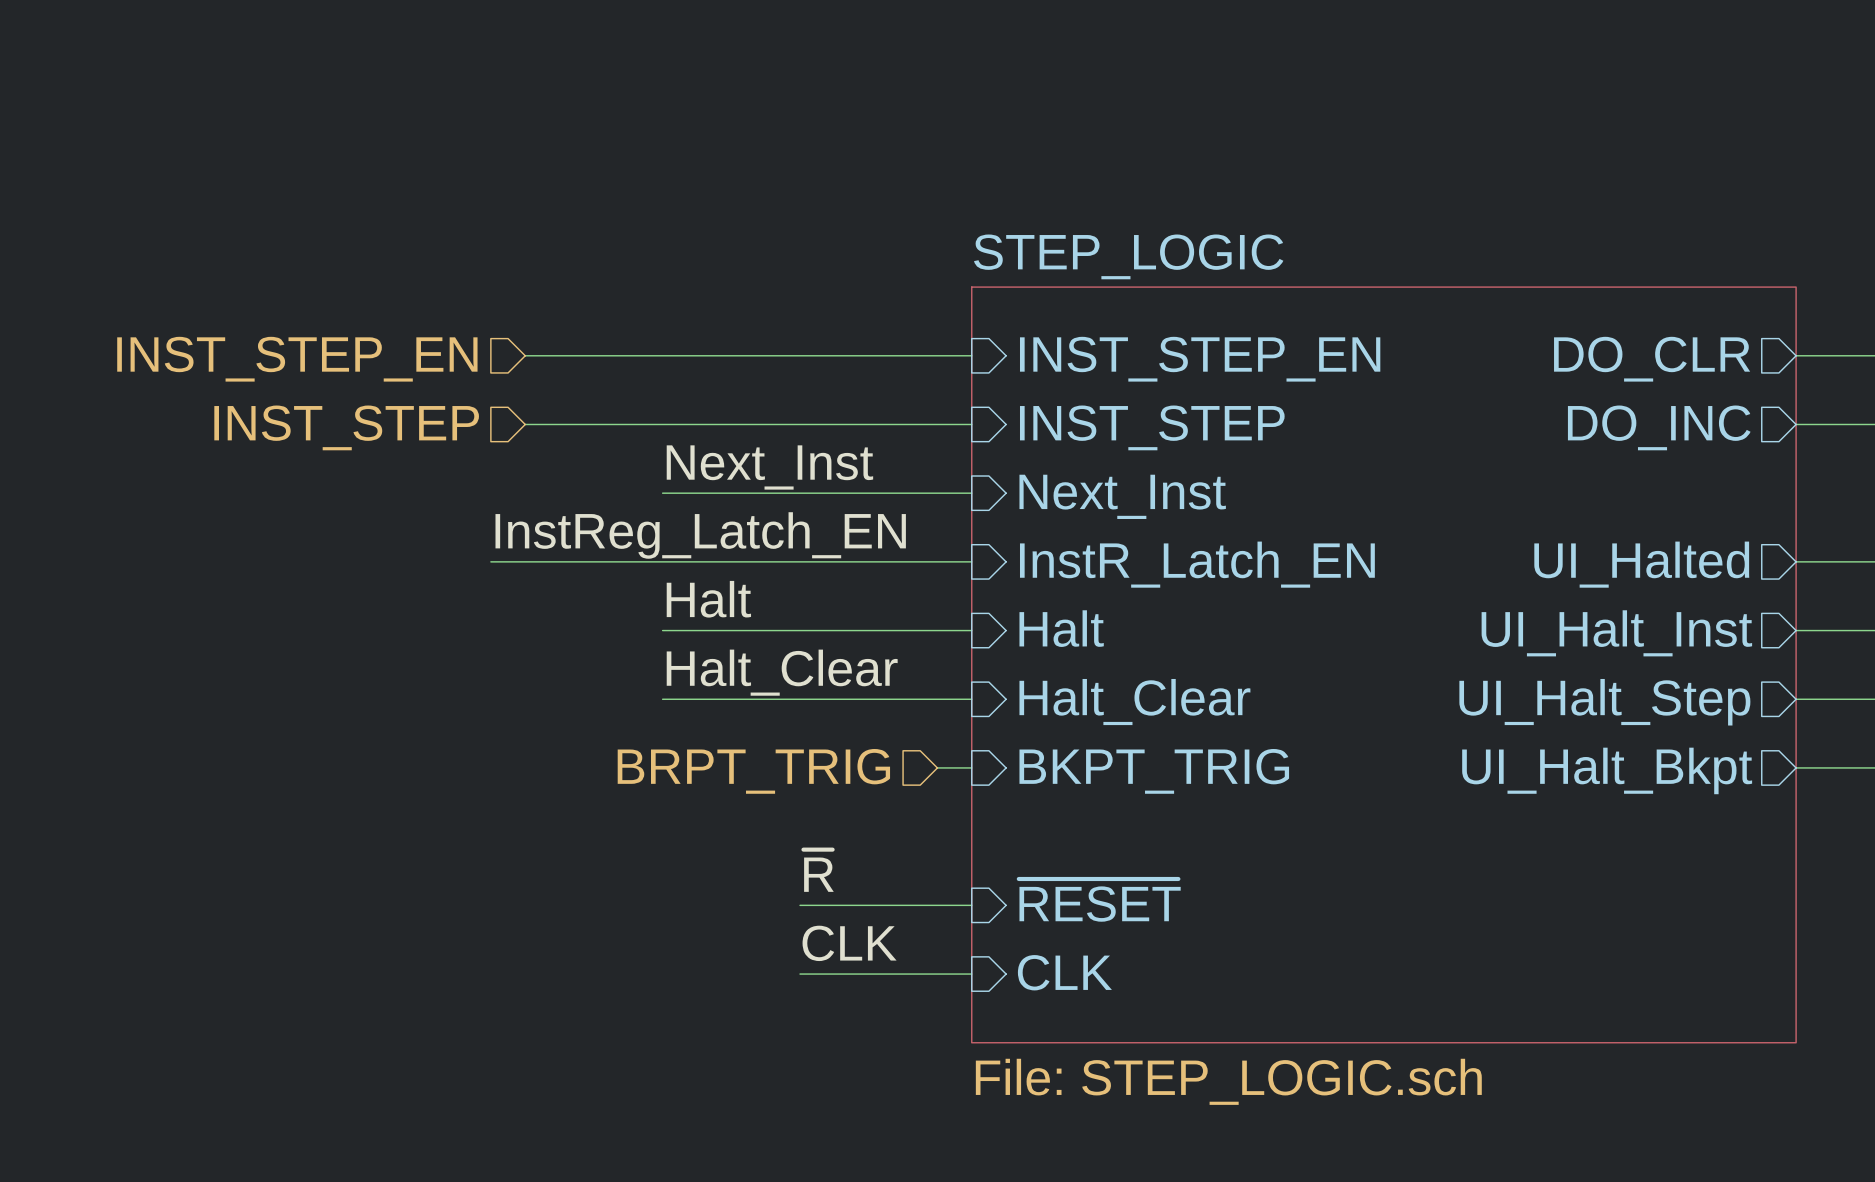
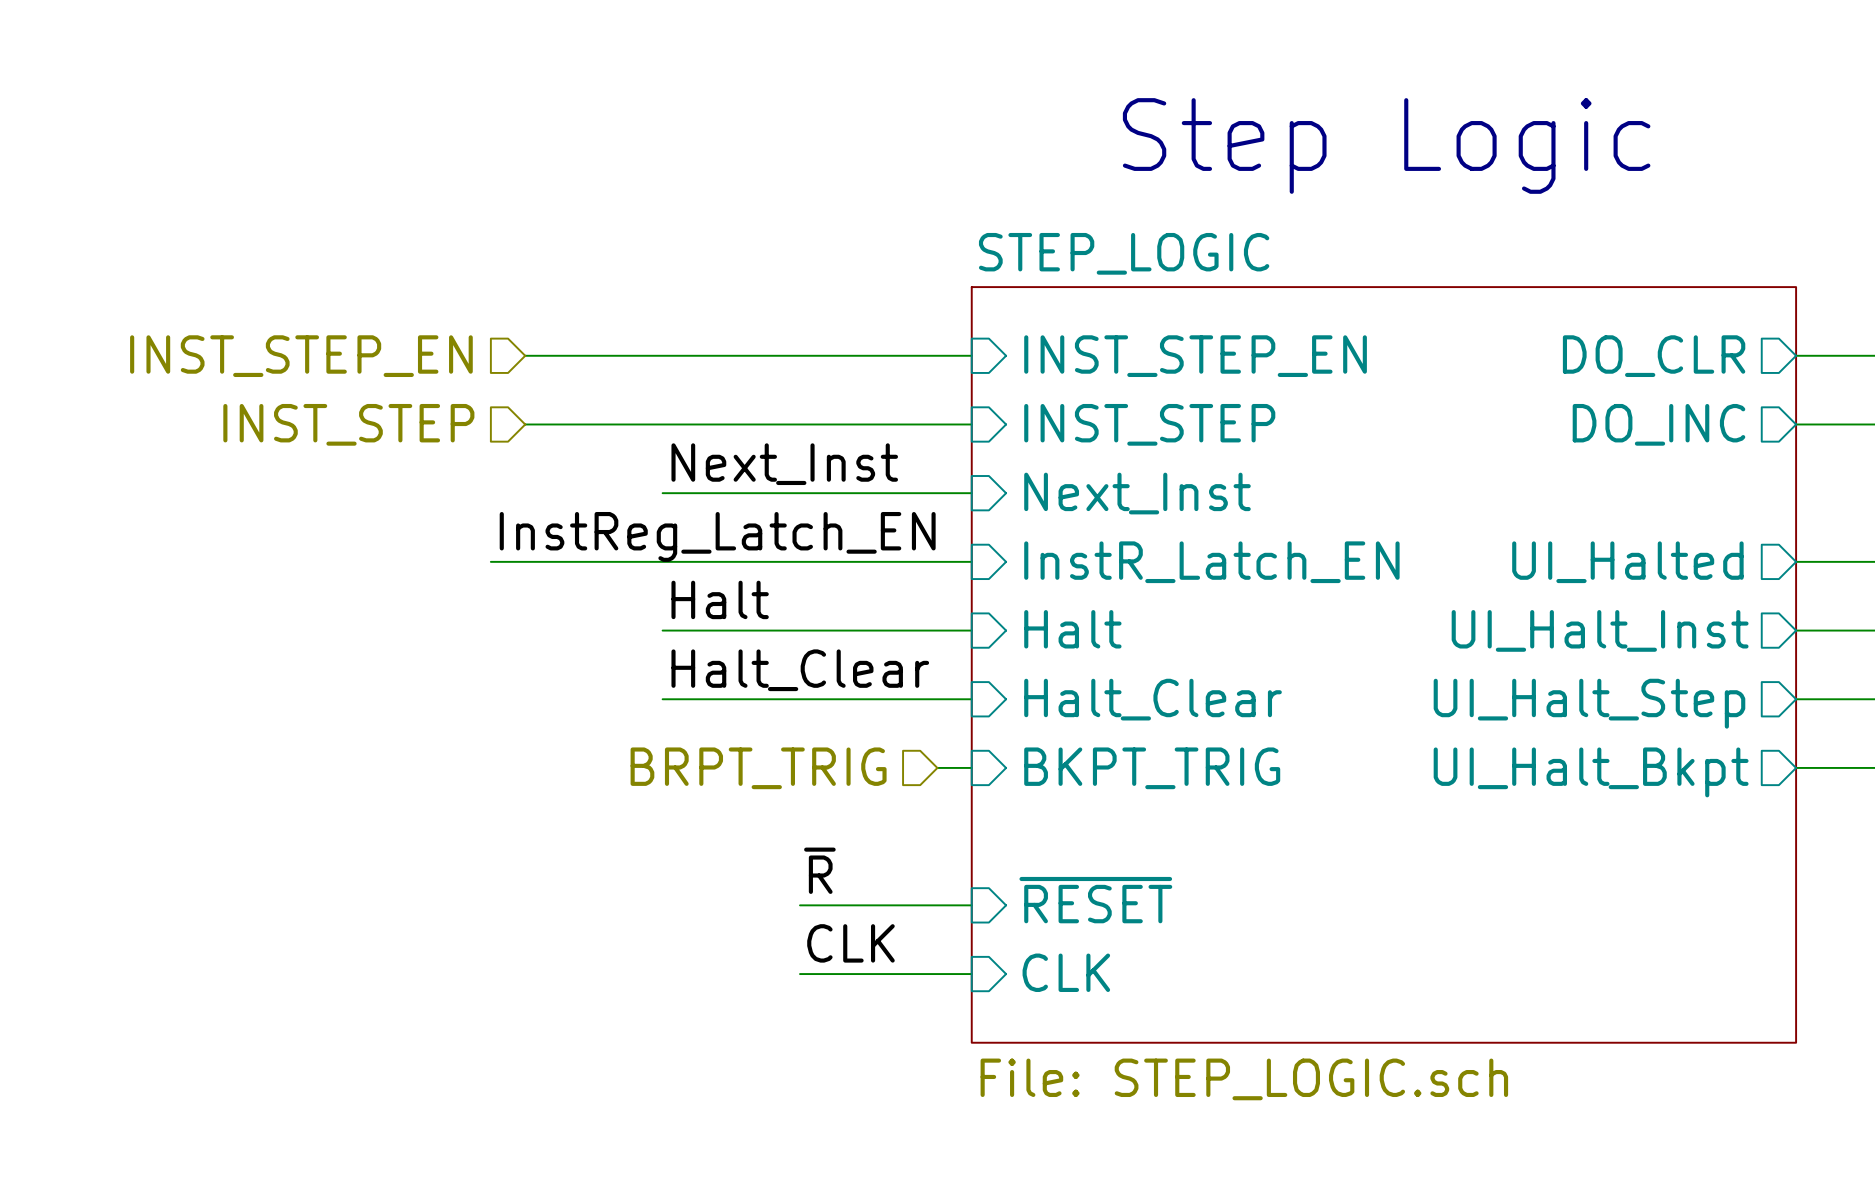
text: none -> Step Logic (1386, 145)

